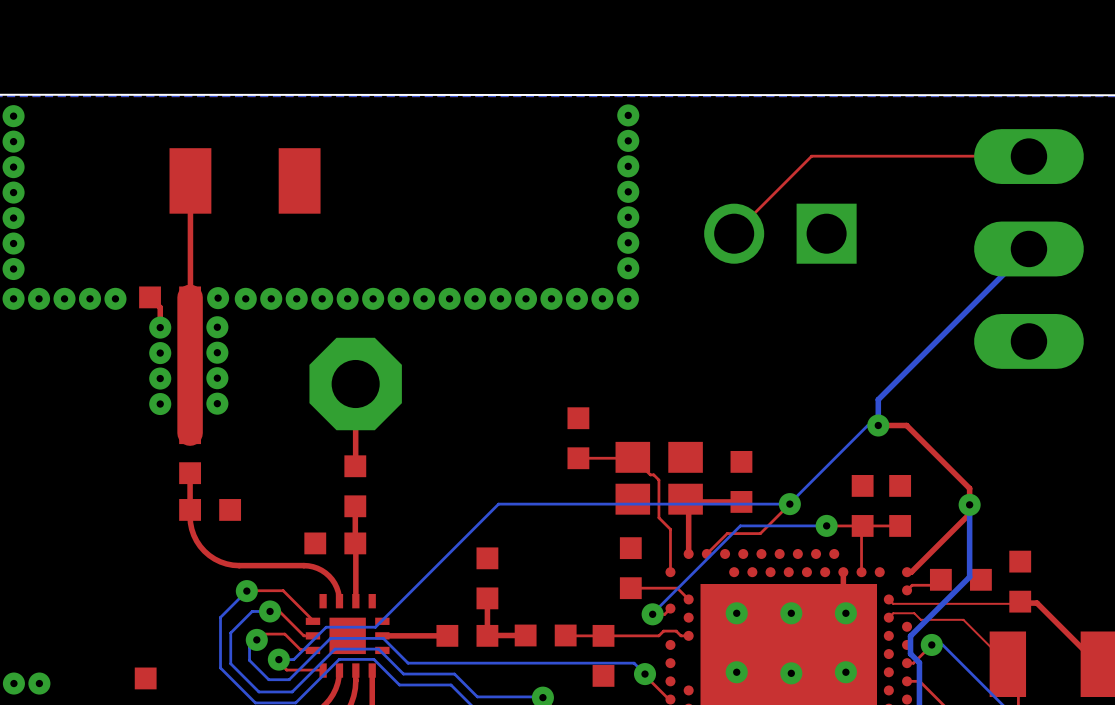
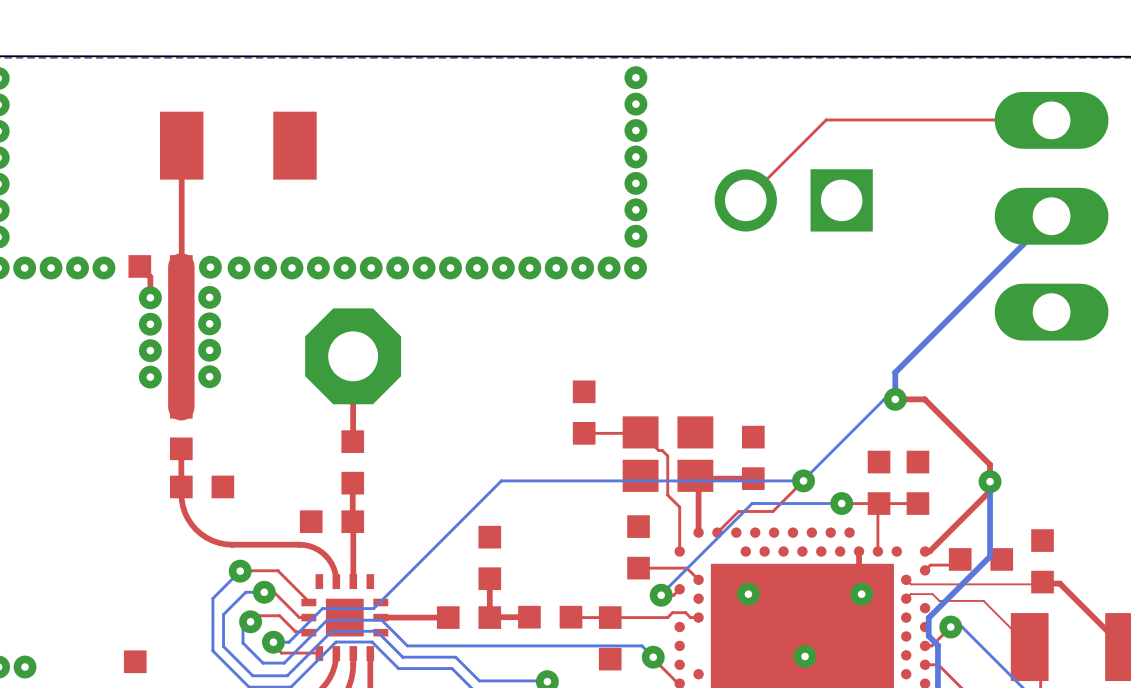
via: (791, 613) -> none
via: (736, 672) -> none
via: (845, 672) -> none

